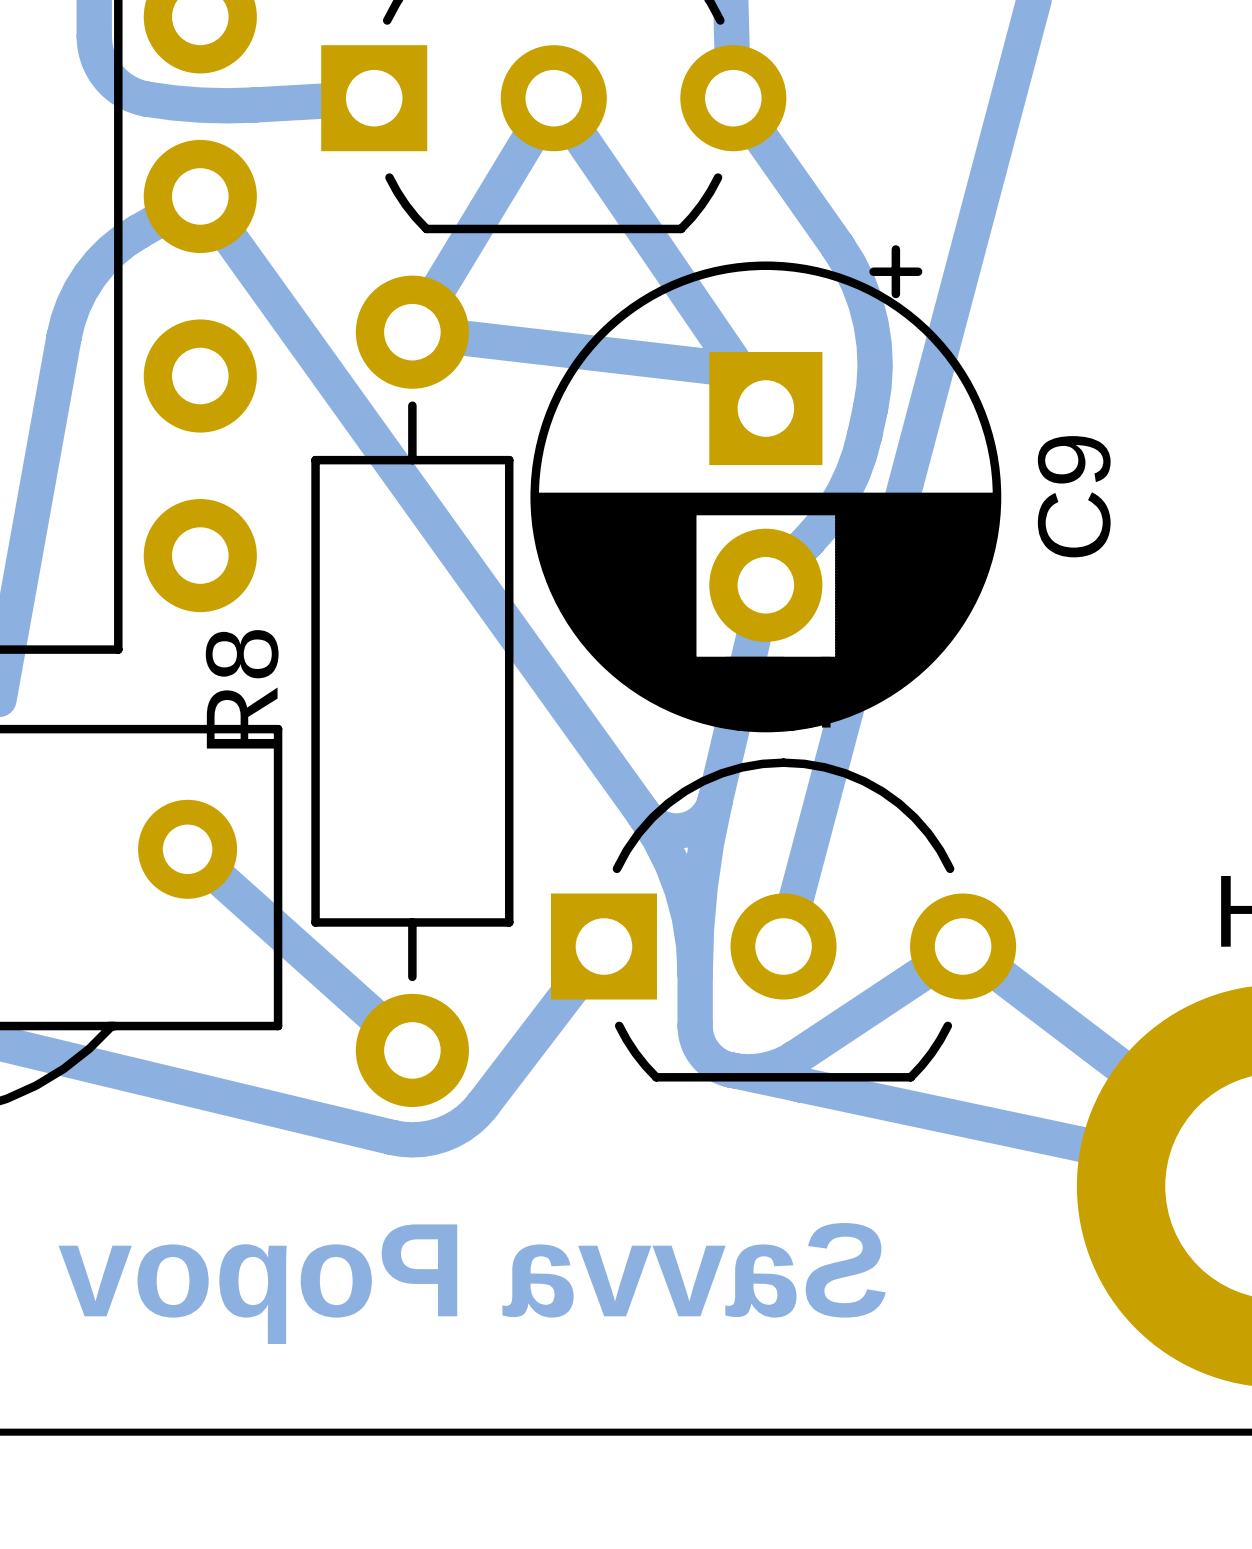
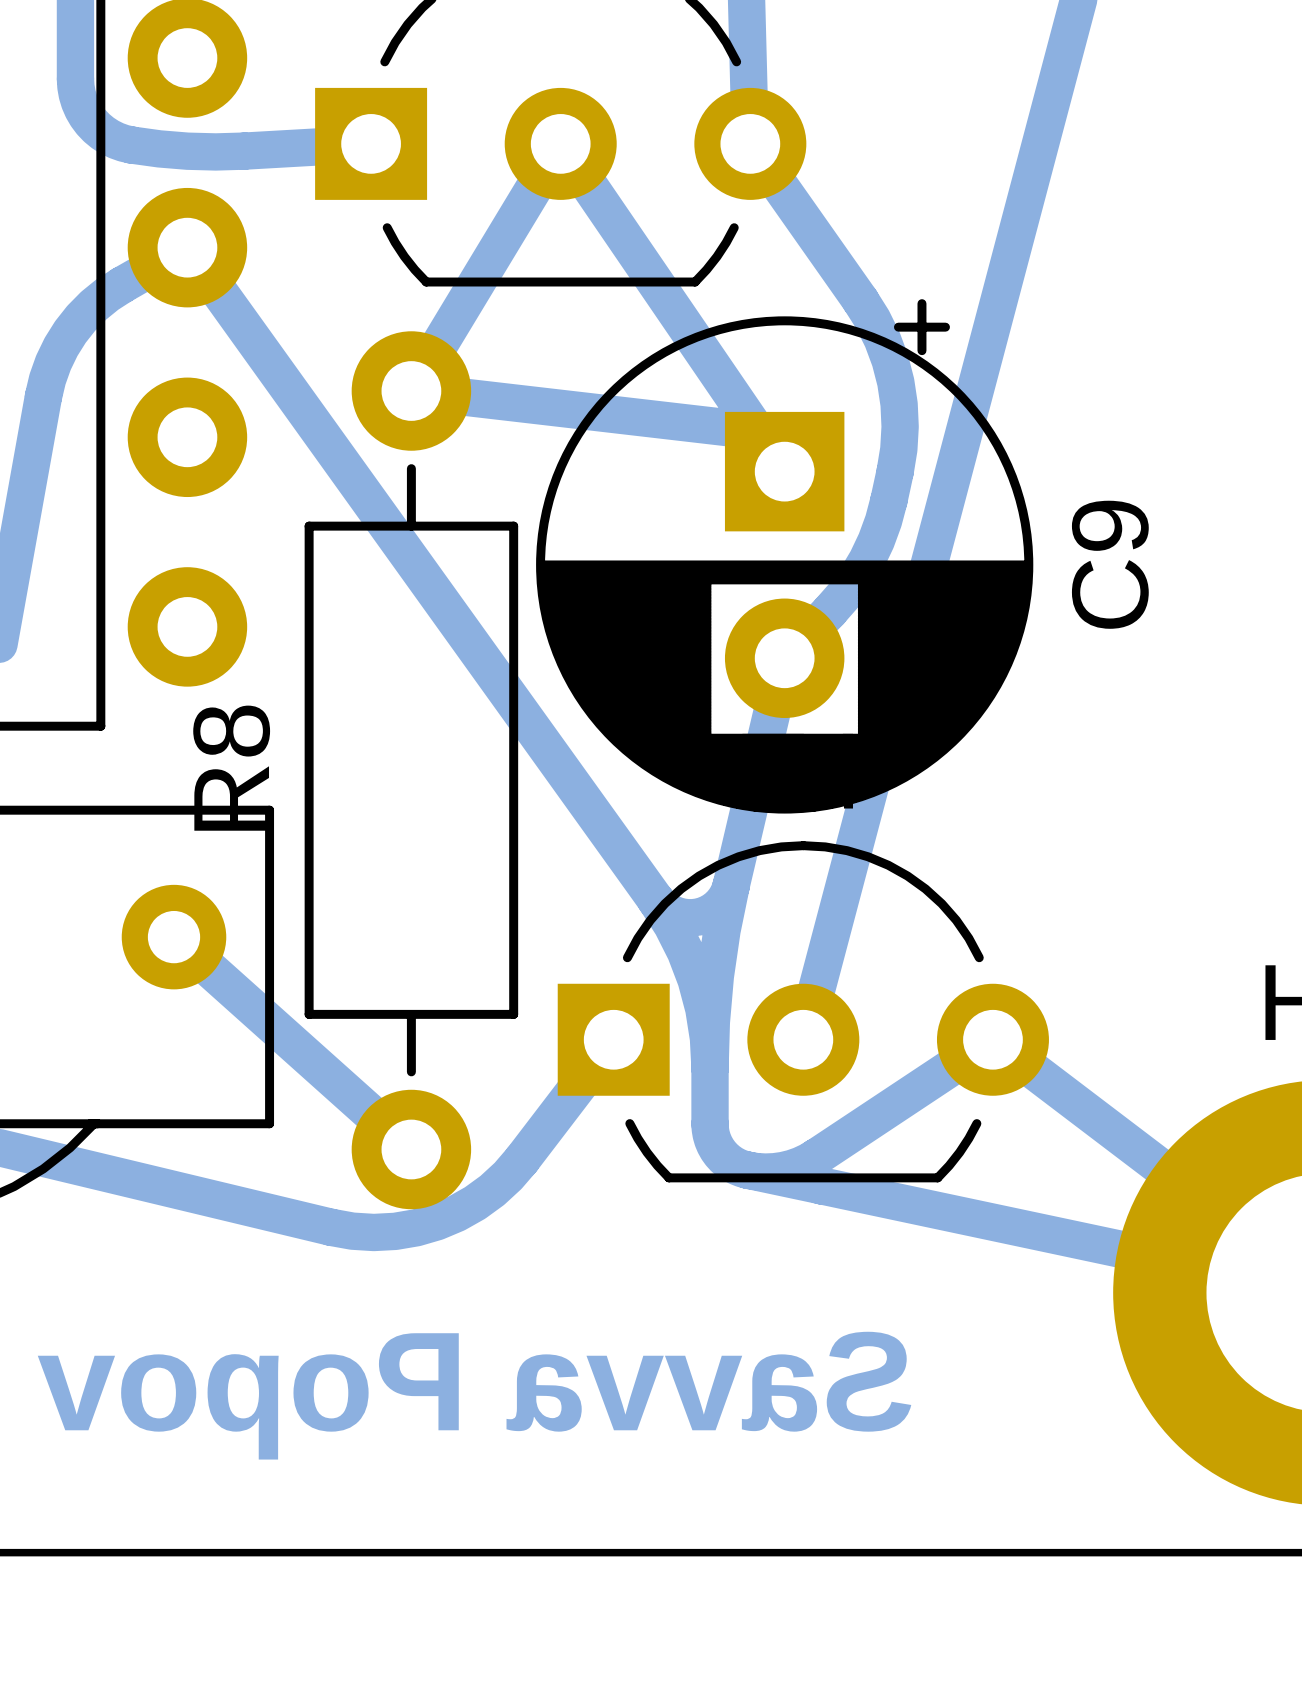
bottom track: (517, 1060) (475, 1113) (460, 1125) (442, 1134) (422, 1139) (402, 1139) (336, 1124) -> (521, 1159) (492, 1190) (475, 1202) (436, 1221) (416, 1227) (373, 1232) (331, 1227)

